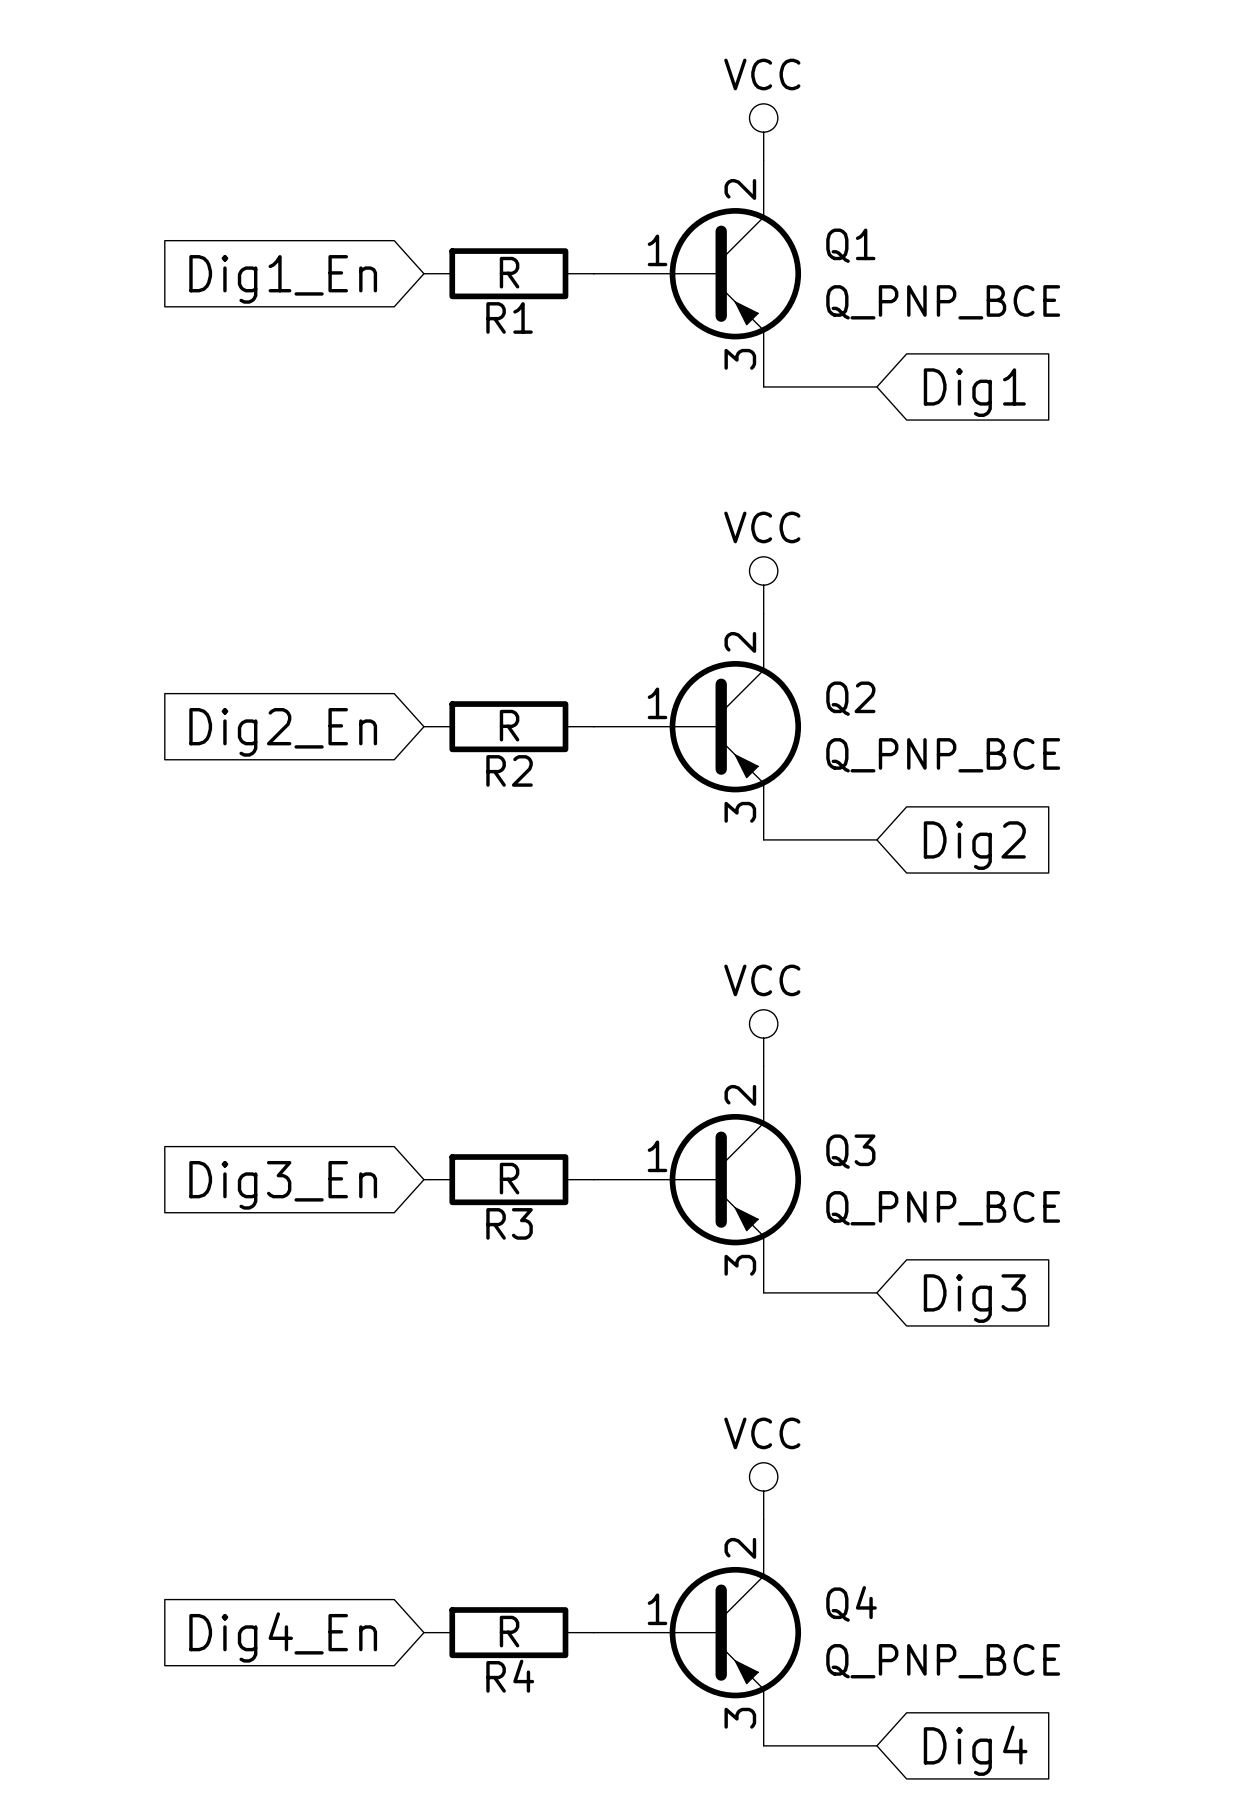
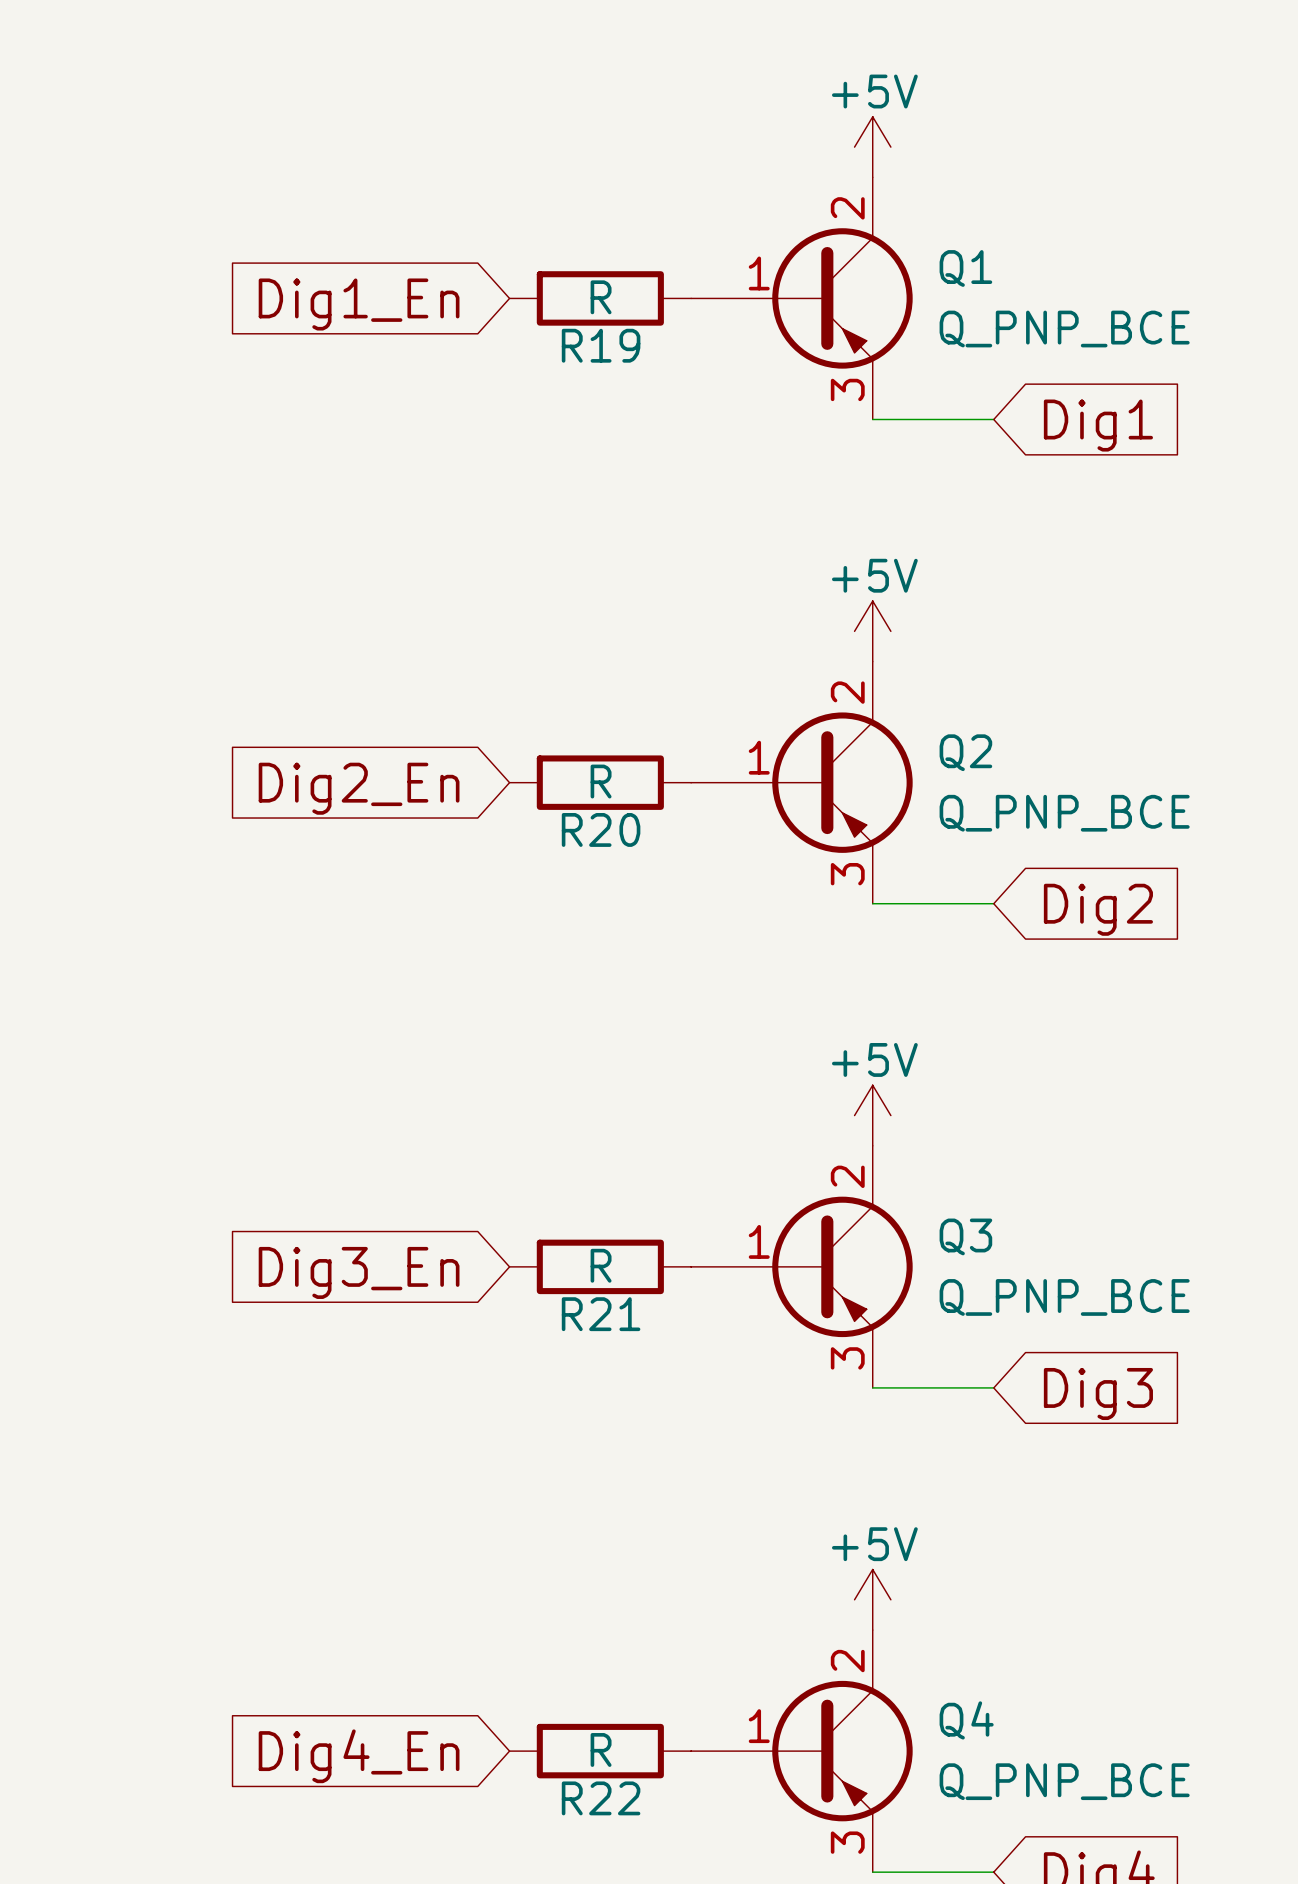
power symbol: VCC (763, 132) -> +5V (872, 147)
R1 name: R1 (509, 317) -> R19 (601, 345)
power symbol: VCC (763, 585) -> +5V (872, 631)
R2 name: R2 (509, 770) -> R20 (601, 829)
power symbol: VCC (763, 1038) -> +5V (872, 1115)
R3 name: R3 (509, 1223) -> R21 (601, 1314)
power symbol: VCC (763, 1491) -> +5V (872, 1599)
R4 name: R4 (510, 1676) -> R22 (601, 1798)

